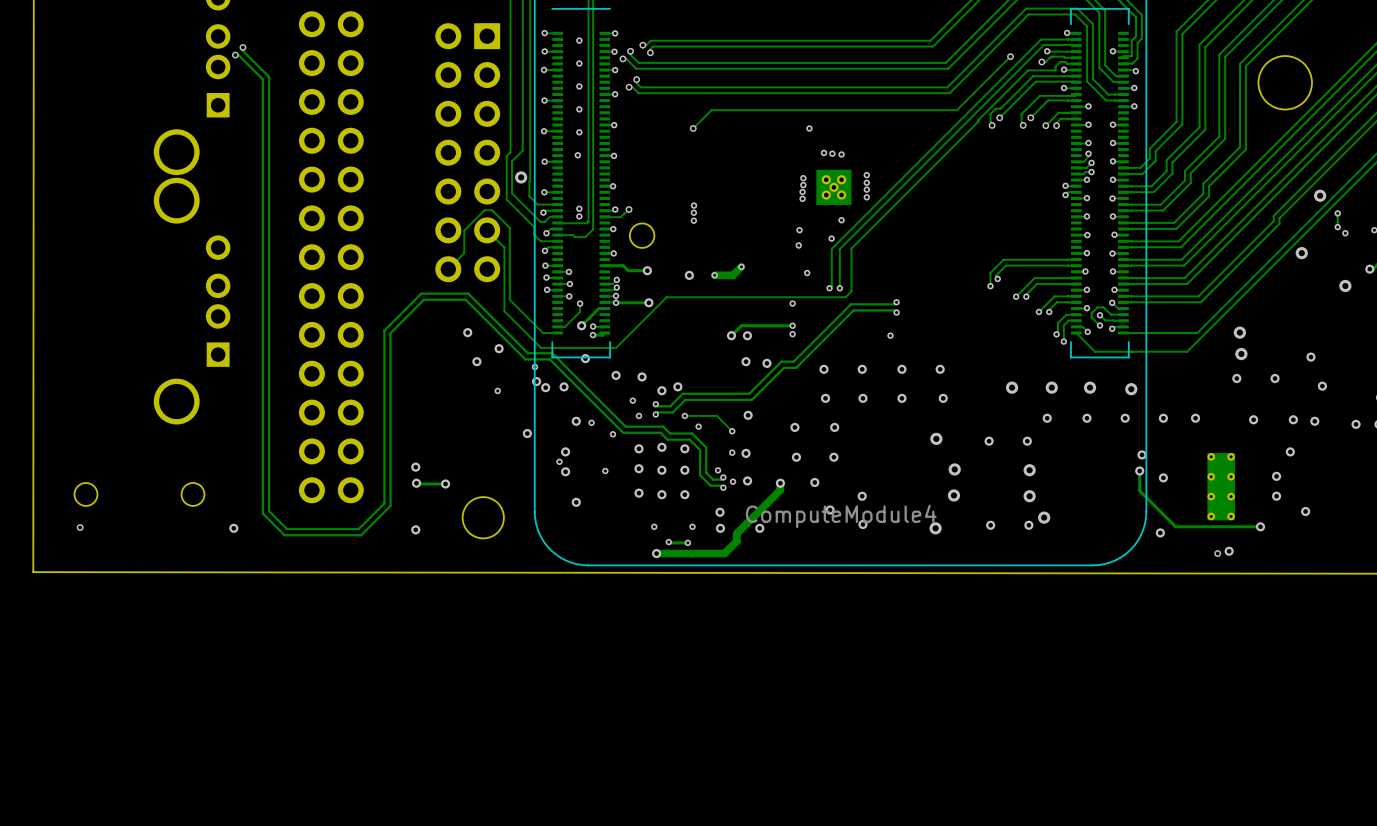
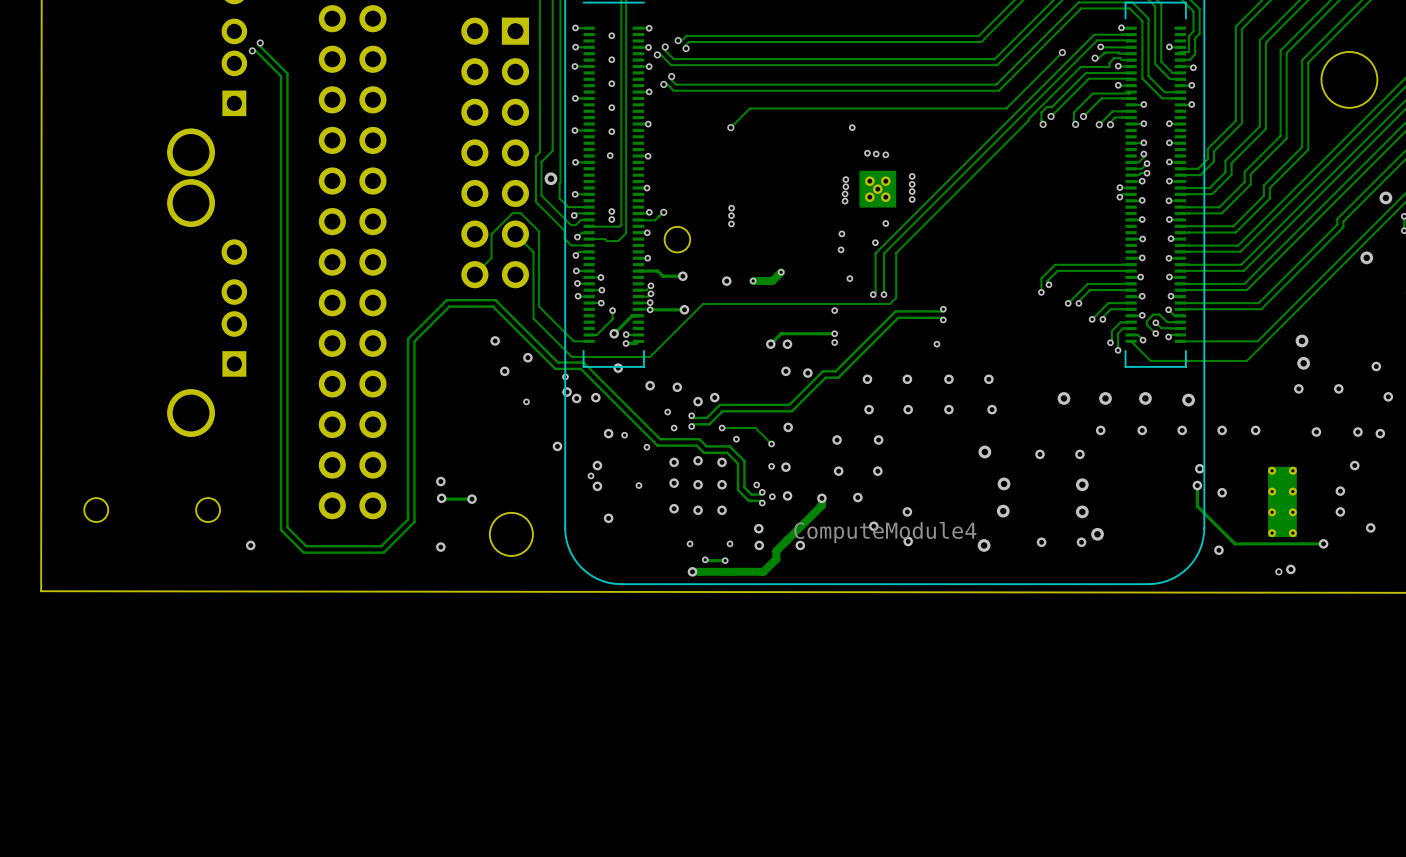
via: (80, 527) -> none

